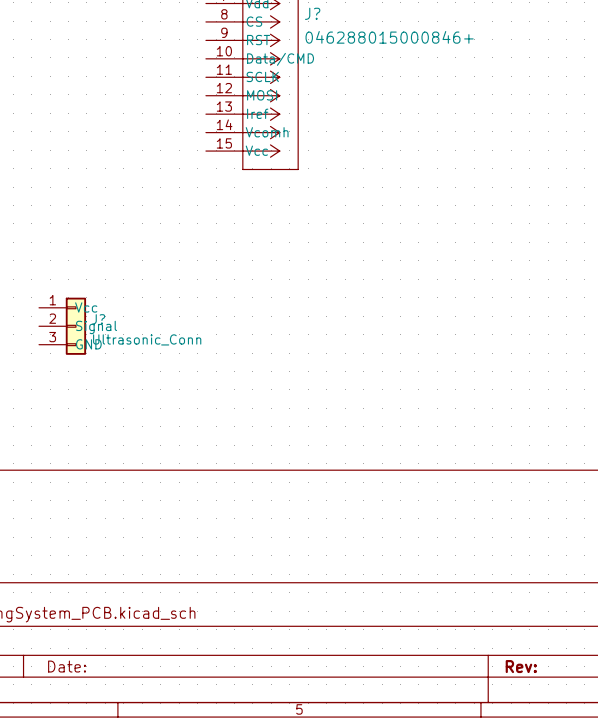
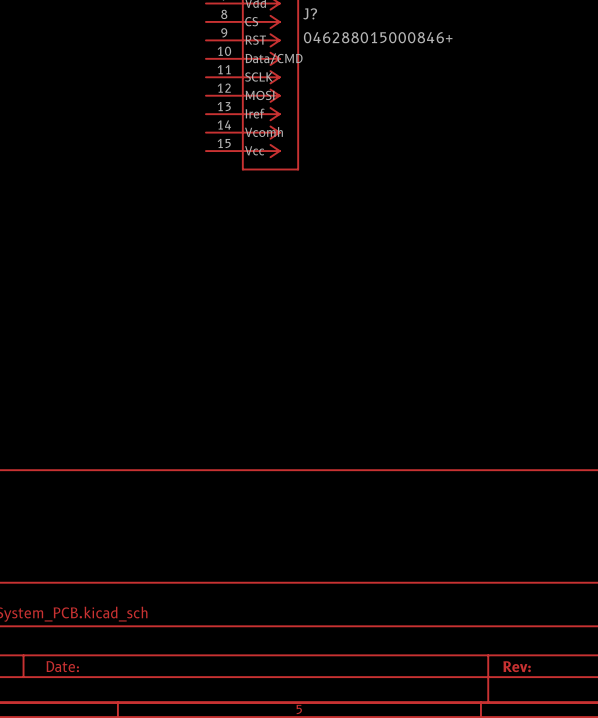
J?: Ultrasonic_Conn (62, 326) -> none

